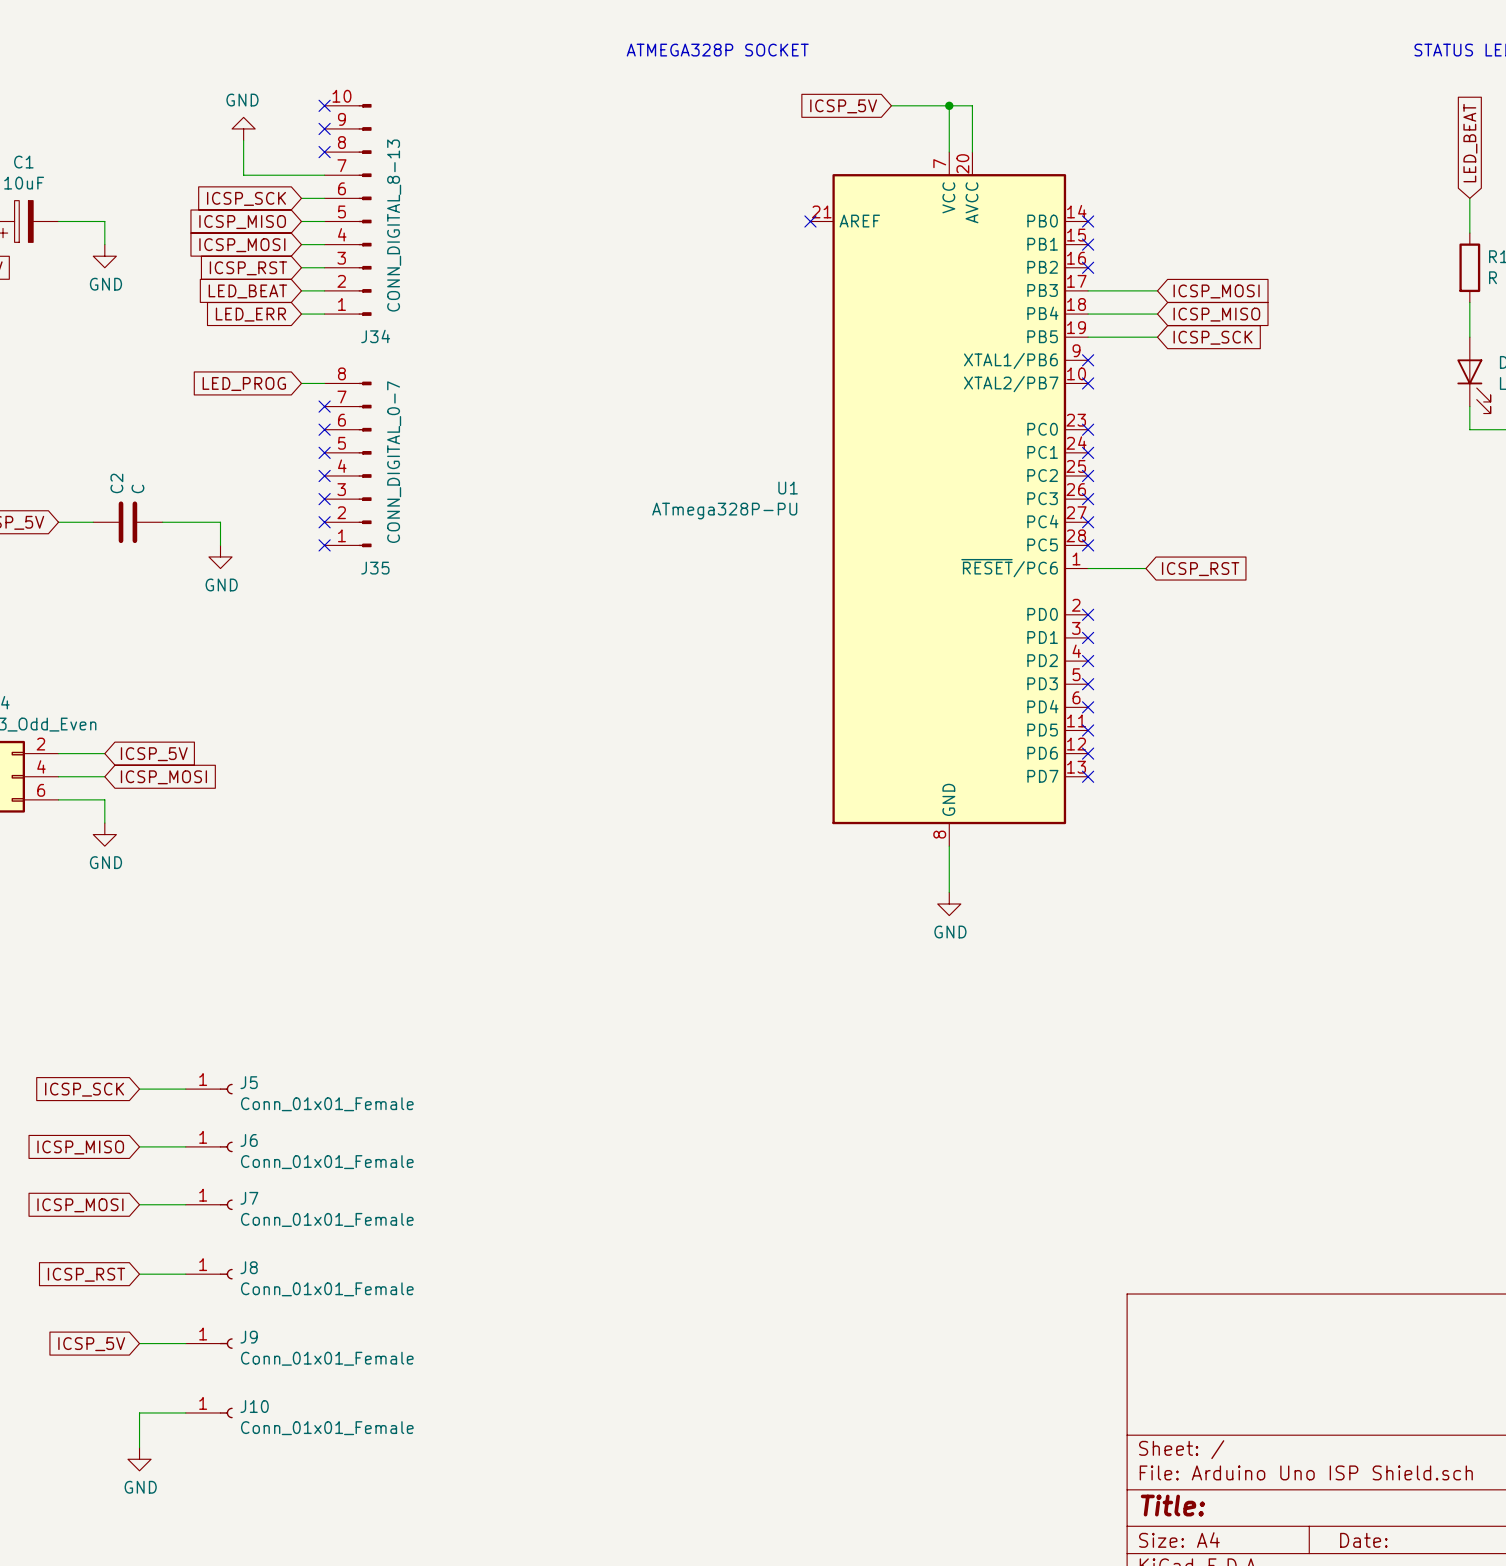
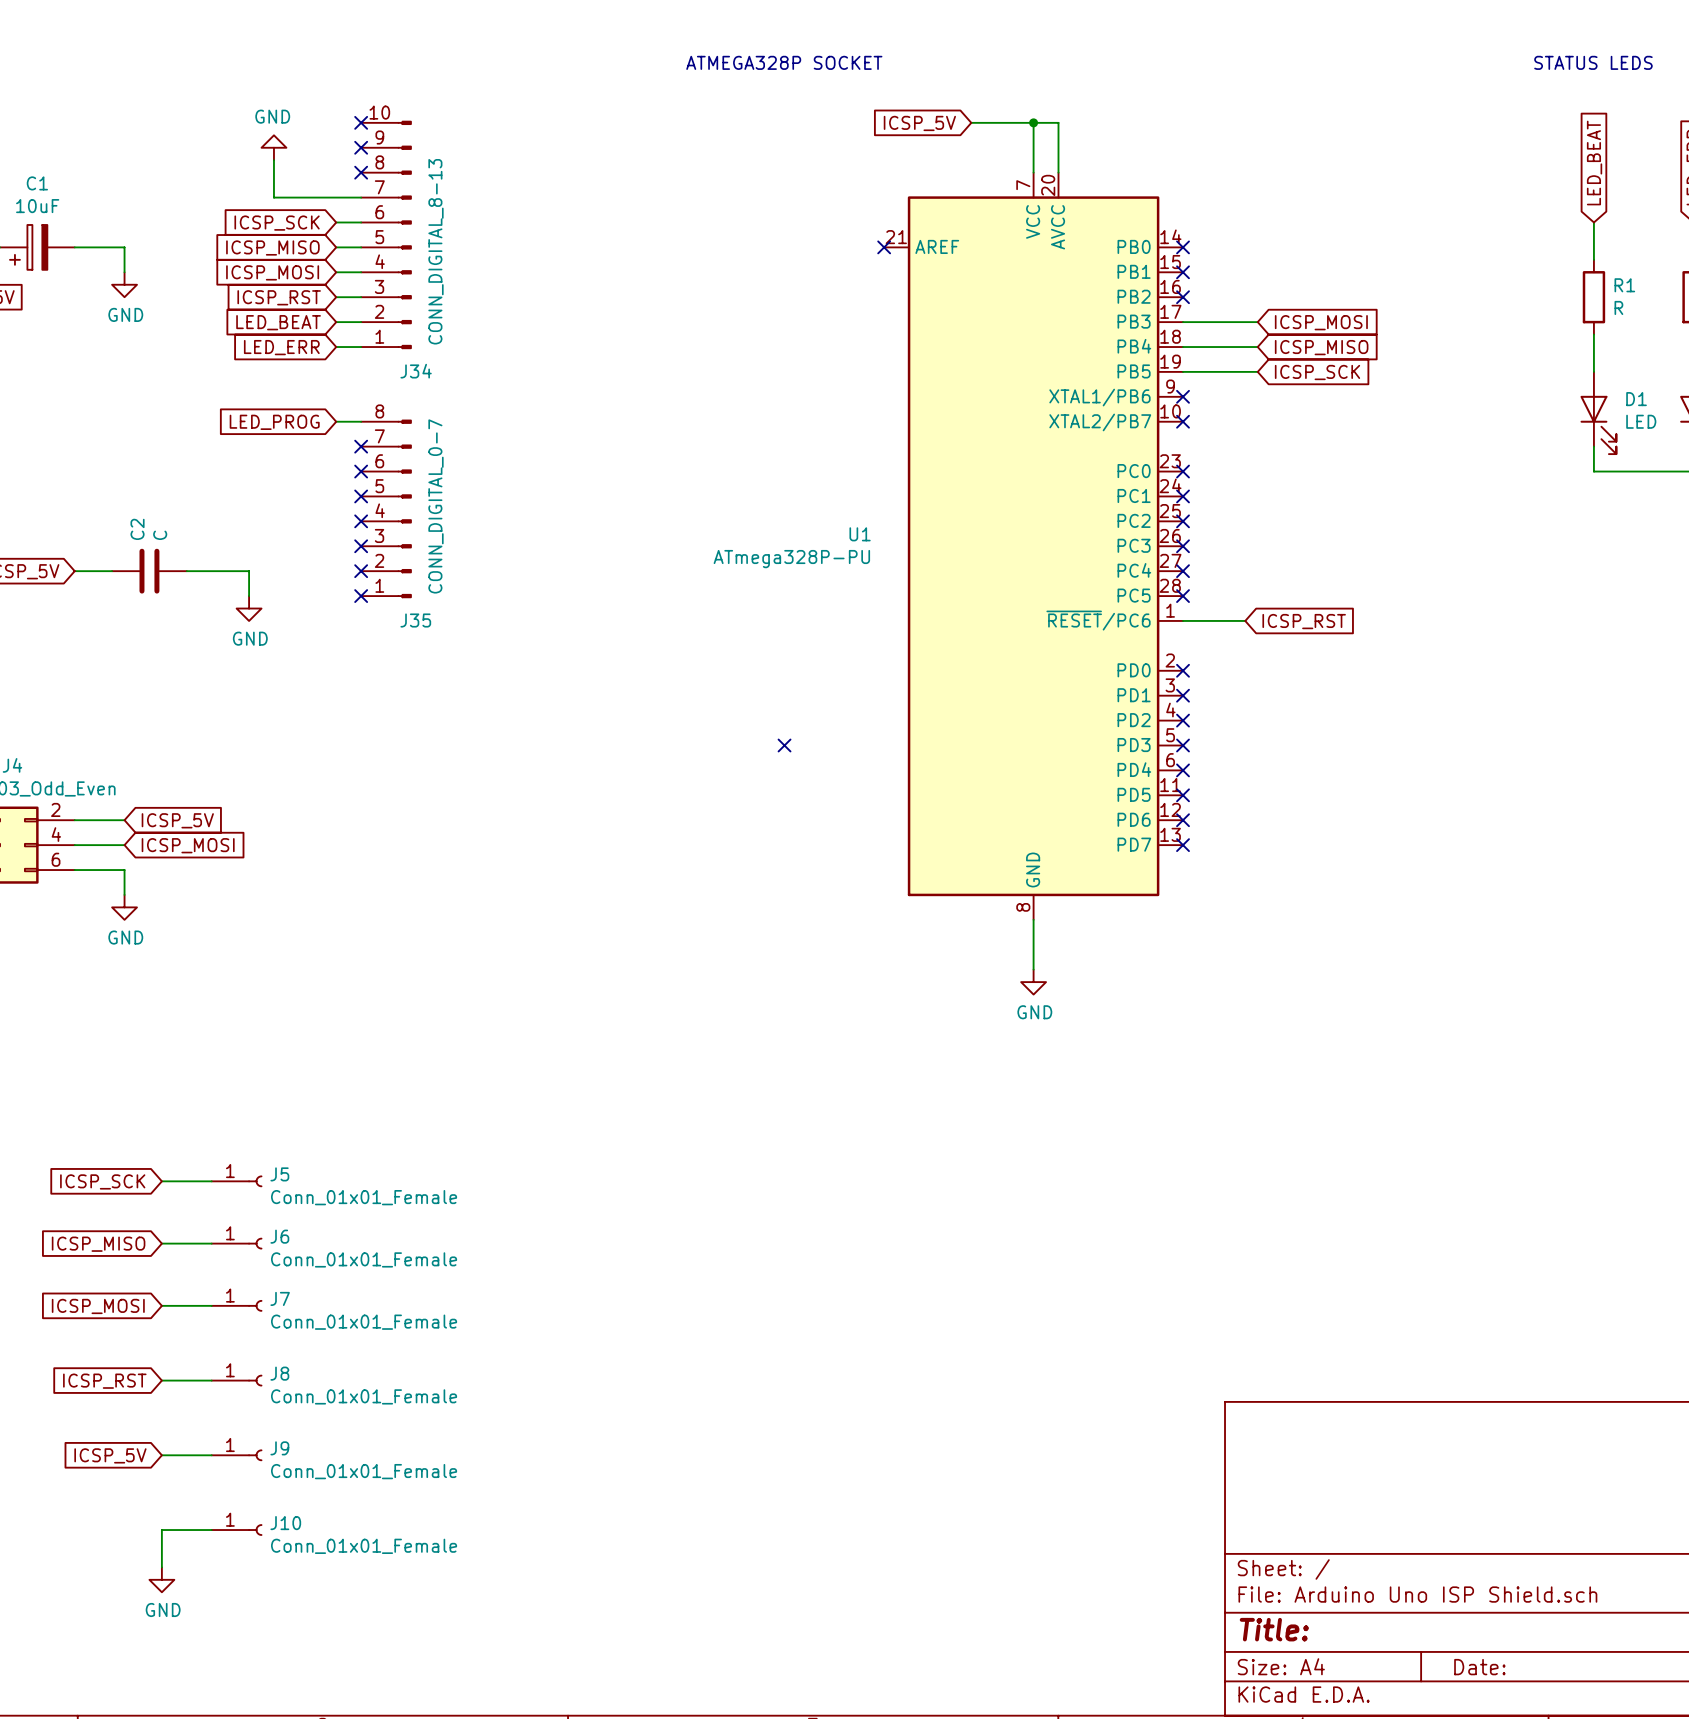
no-connect mark: none -> (784, 745)

